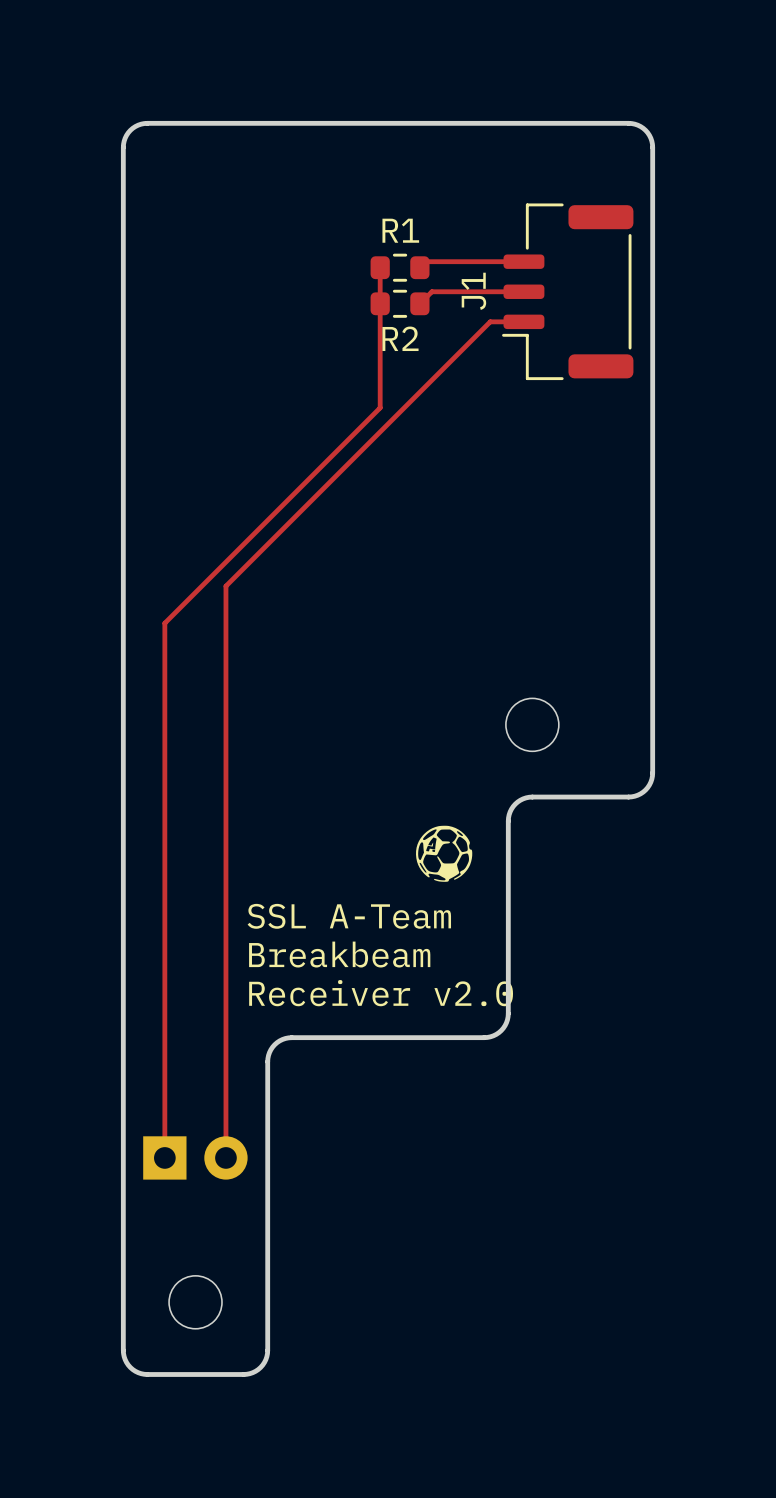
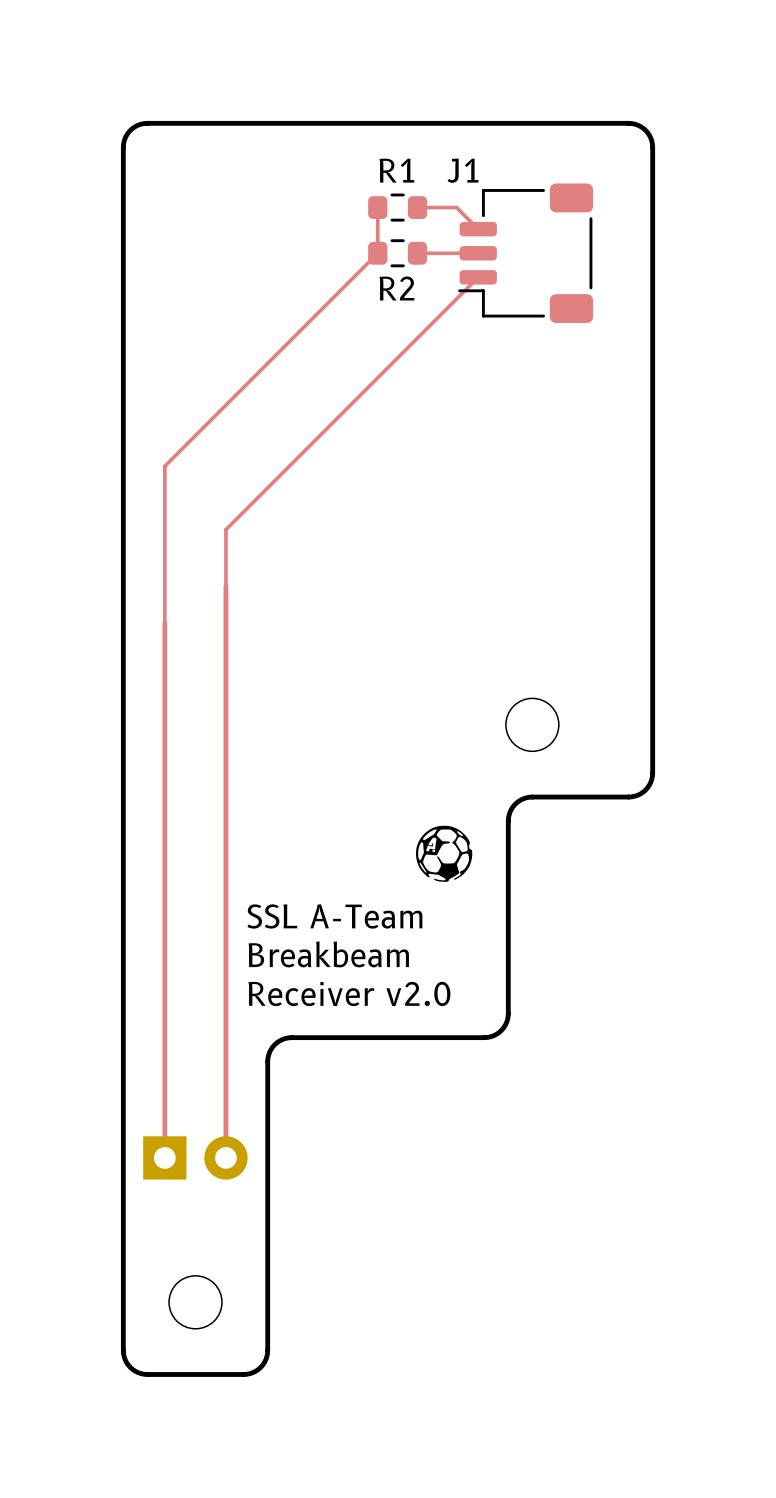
J1 footprint: [502, 203, 634, 381] -> [458, 183, 594, 324]
top track: none -> (417, 207) (456, 207) (478, 229)
top track: none -> (417, 253) (478, 253)
top track: (523, 261) (425, 261) (419, 267) -> none
top track: (380, 267) (380, 407) (164, 623) -> (377, 207) (377, 253) (164, 466) (164, 623)
R1 position: (400, 267) -> (397, 207)
J1 name position: J1 (473, 291) -> J1 (463, 170)
top track: (523, 291) (431, 291) (419, 303) -> none
R2 position: (400, 303) -> (397, 253)
top track: (523, 321) (490, 321) (225, 586) -> (478, 277) (225, 529) (225, 586)

